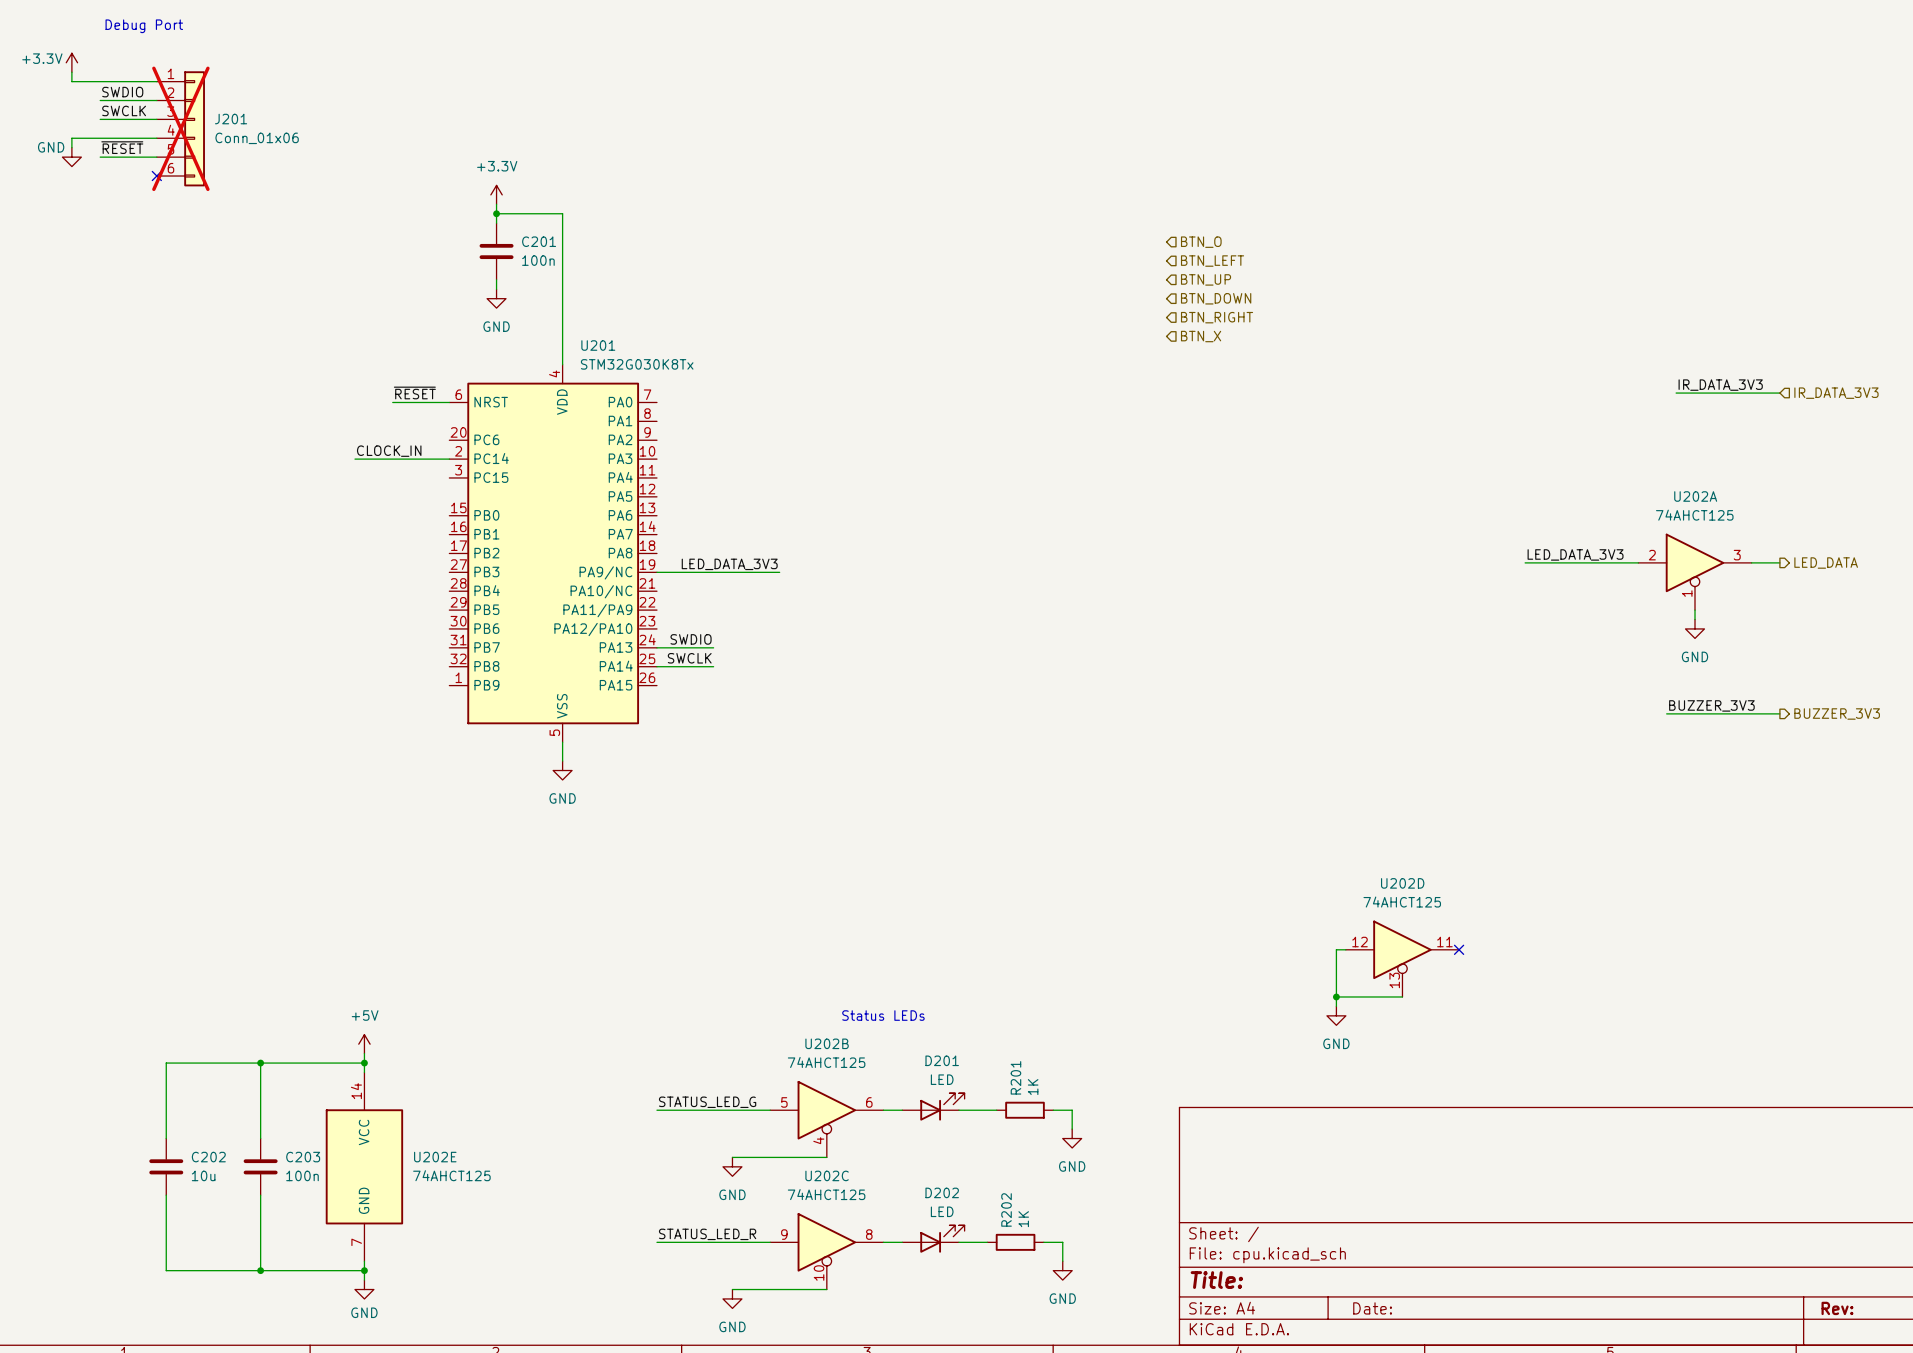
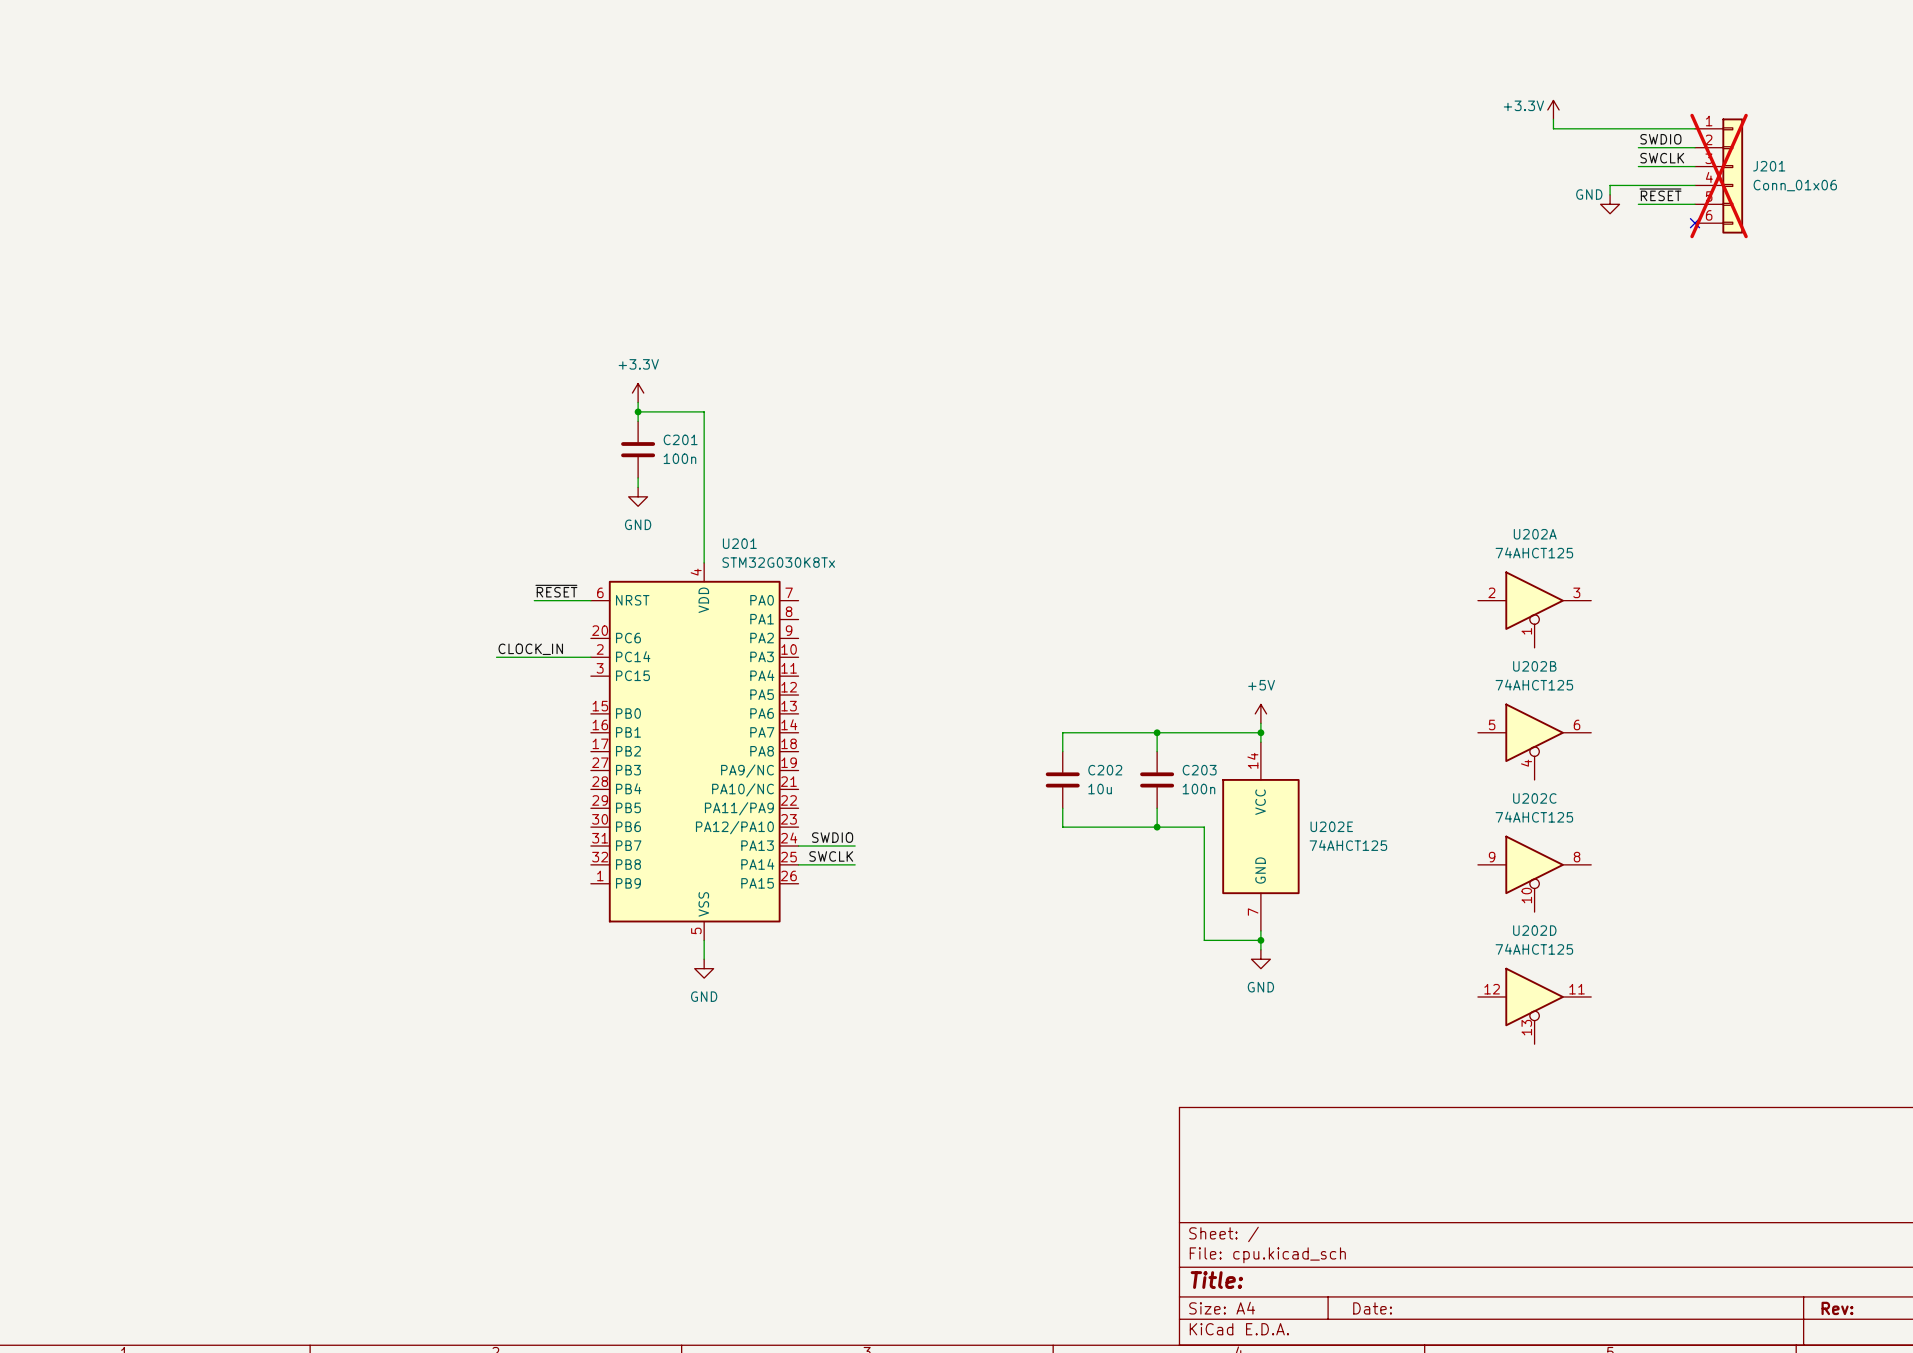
text: Debug Port (144, 26) -> none
power symbol: +3.3V (71, 62) -> none
wire: (71, 72) (71, 81) (156, 81) -> none
label: SWDIO (122, 92) -> none
wire: (100, 100) (156, 100) -> none
power symbol: none -> +3.3V (1553, 109)
label: SWCLK (124, 110) -> none
wire: (100, 119) (156, 119) -> none
wire: none -> (1553, 119) (1553, 128) (1695, 128)
J201 position: (180, 128) -> (1719, 176)
wire: (156, 138) (71, 138) (71, 147) -> none
label: none -> SWDIO (1660, 139)
label: ~{RESET} (122, 147) -> none
wire: none -> (1638, 147) (1695, 147)
power symbol: GND (71, 157) -> none
wire: (100, 157) (156, 157) -> none
label: none -> SWCLK (1662, 158)
wire: none -> (1638, 166) (1695, 166)
no-connect mark: (156, 176) -> none
wire: none -> (1695, 185) (1610, 185) (1610, 194)
power symbol: +3.3V (496, 194) -> none
label: none -> ~{RESET} (1660, 194)
wire: (496, 204) (496, 223) -> none
power symbol: none -> GND (1610, 204)
wire: none -> (1638, 204) (1695, 204)
wire: (496, 213) (562, 213) (562, 364) -> none
junction: (496, 213) -> none
no-connect mark: none -> (1695, 223)
hierarchical label: BTN_O (1201, 242) -> none
C201 position: (496, 251) -> (638, 449)
hierarchical label: BTN_LEFT (1212, 261) -> none
wire: (496, 279) (496, 289) -> none
hierarchical label: BTN_UP (1206, 279) -> none
power symbol: GND (496, 298) -> none
hierarchical label: BTN_DOWN (1216, 298) -> none
hierarchical label: BTN_RIGHT (1217, 317) -> none
hierarchical label: BTN_X (1201, 336) -> none
label: IR_DATA_3V3 (1720, 385) -> none
label: ~{RESET} (414, 392) -> none
power symbol: none -> +3.3V (638, 393)
wire: (1676, 393) (1779, 393) -> none
hierarchical label: IR_DATA_3V3 (1836, 393) -> none
wire: (392, 402) (449, 402) -> none
wire: none -> (638, 411) (704, 411) (704, 562)
junction: none -> (638, 411)
label: CLOCK_IN (389, 451) -> none
wire: (355, 459) (449, 459) -> none
power symbol: none -> GND (638, 496)
U201 position: (553, 553) -> (694, 751)
label: LED_DATA_3V3 (1575, 554) -> none
wire: (1525, 562) (1638, 562) -> none
wire: (1751, 562) (1779, 562) -> none
hierarchical label: LED_DATA (1826, 563) -> none
label: LED_DATA_3V3 (729, 564) -> none
U202A position: (1695, 571) -> (1534, 609)
wire: (656, 572) (779, 572) -> none
label: none -> ~{RESET} (556, 591)
wire: (1695, 610) (1695, 619) -> none
power symbol: GND (1695, 628) -> none
label: SWDIO (691, 639) -> none
label: none -> CLOCK_IN (530, 649)
label: SWCLK (689, 658) -> none
label: BUZZER_3V3 (1711, 705) -> none
power symbol: none -> +5V (1260, 713)
wire: (1666, 713) (1779, 713) -> none
hierarchical label: BUZZER_3V3 (1837, 713) -> none
wire: none -> (1260, 723) (1260, 742)
wire: none -> (1157, 732) (1157, 751)
junction: none -> (1157, 732)
wire: none -> (1260, 732) (1062, 732) (1062, 751)
junction: none -> (1260, 732)
wire: (562, 742) (562, 761) -> none
power symbol: GND (562, 770) -> none
wire: none -> (1062, 808) (1062, 827) (1204, 827) (1204, 940) (1260, 940)
wire: none -> (1157, 808) (1157, 827)
junction: none -> (1157, 827)
label: none -> SWDIO (832, 837)
wire: none -> (798, 846) (855, 846)
label: none -> SWCLK (831, 856)
wire: none -> (798, 864) (855, 864)
wire: none -> (1260, 930) (1260, 949)
wire: none -> (704, 940) (704, 959)
junction: none -> (1260, 940)
wire: (1345, 949) (1336, 949) (1336, 1006) -> none
no-connect mark: (1459, 949) -> none
U202D position: (1402, 958) -> (1534, 1005)
power symbol: none -> GND (704, 968)
wire: (1336, 996) (1402, 996) -> none
junction: (1336, 996) -> none
text: Status LEDs (883, 1015) -> none
power symbol position: GND (1336, 1015) -> GND (1260, 959)
power symbol: +5V (364, 1044) -> none
wire: (364, 1053) (364, 1072) -> none
wire: (260, 1063) (260, 1138) -> none
junction: (260, 1063) -> none
wire: (364, 1063) (166, 1063) (166, 1138) -> none
junction: (364, 1063) -> none
label: STATUS_LED_G (707, 1102) -> none
D201: LED (933, 1106) -> none
wire: (656, 1110) (770, 1110) -> none
wire: (883, 1110) (902, 1110) -> none
wire: (958, 1110) (996, 1110) -> none
R201: 1K (1025, 1110) -> none
wire: (1053, 1110) (1072, 1110) (1072, 1129) -> none
U202B position: (826, 1119) -> (1534, 741)
power symbol: GND (1072, 1138) -> none
wire: (732, 1157) (826, 1157) -> none
C202 position: (166, 1166) -> (1062, 779)
C203 position: (260, 1166) -> (1157, 779)
U202E position: (364, 1166) -> (1260, 836)
power symbol: GND (732, 1166) -> none
wire: (166, 1195) (166, 1270) (364, 1270) -> none
wire: (260, 1195) (260, 1270) -> none
label: STATUS_LED_R (707, 1234) -> none
D202: LED (933, 1239) -> none
wire: (656, 1242) (770, 1242) -> none
wire: (883, 1242) (902, 1242) -> none
wire: (958, 1242) (987, 1242) -> none
R202: 1K (1015, 1242) -> none
wire: (1043, 1242) (1062, 1242) (1062, 1261) -> none
U202C position: (826, 1251) -> (1534, 873)
wire: (364, 1261) (364, 1280) -> none
junction: (260, 1270) -> none
junction: (364, 1270) -> none
power symbol: GND (1062, 1270) -> none
power symbol: GND (364, 1289) -> none
wire: (732, 1289) (826, 1289) -> none
power symbol: GND (732, 1298) -> none

